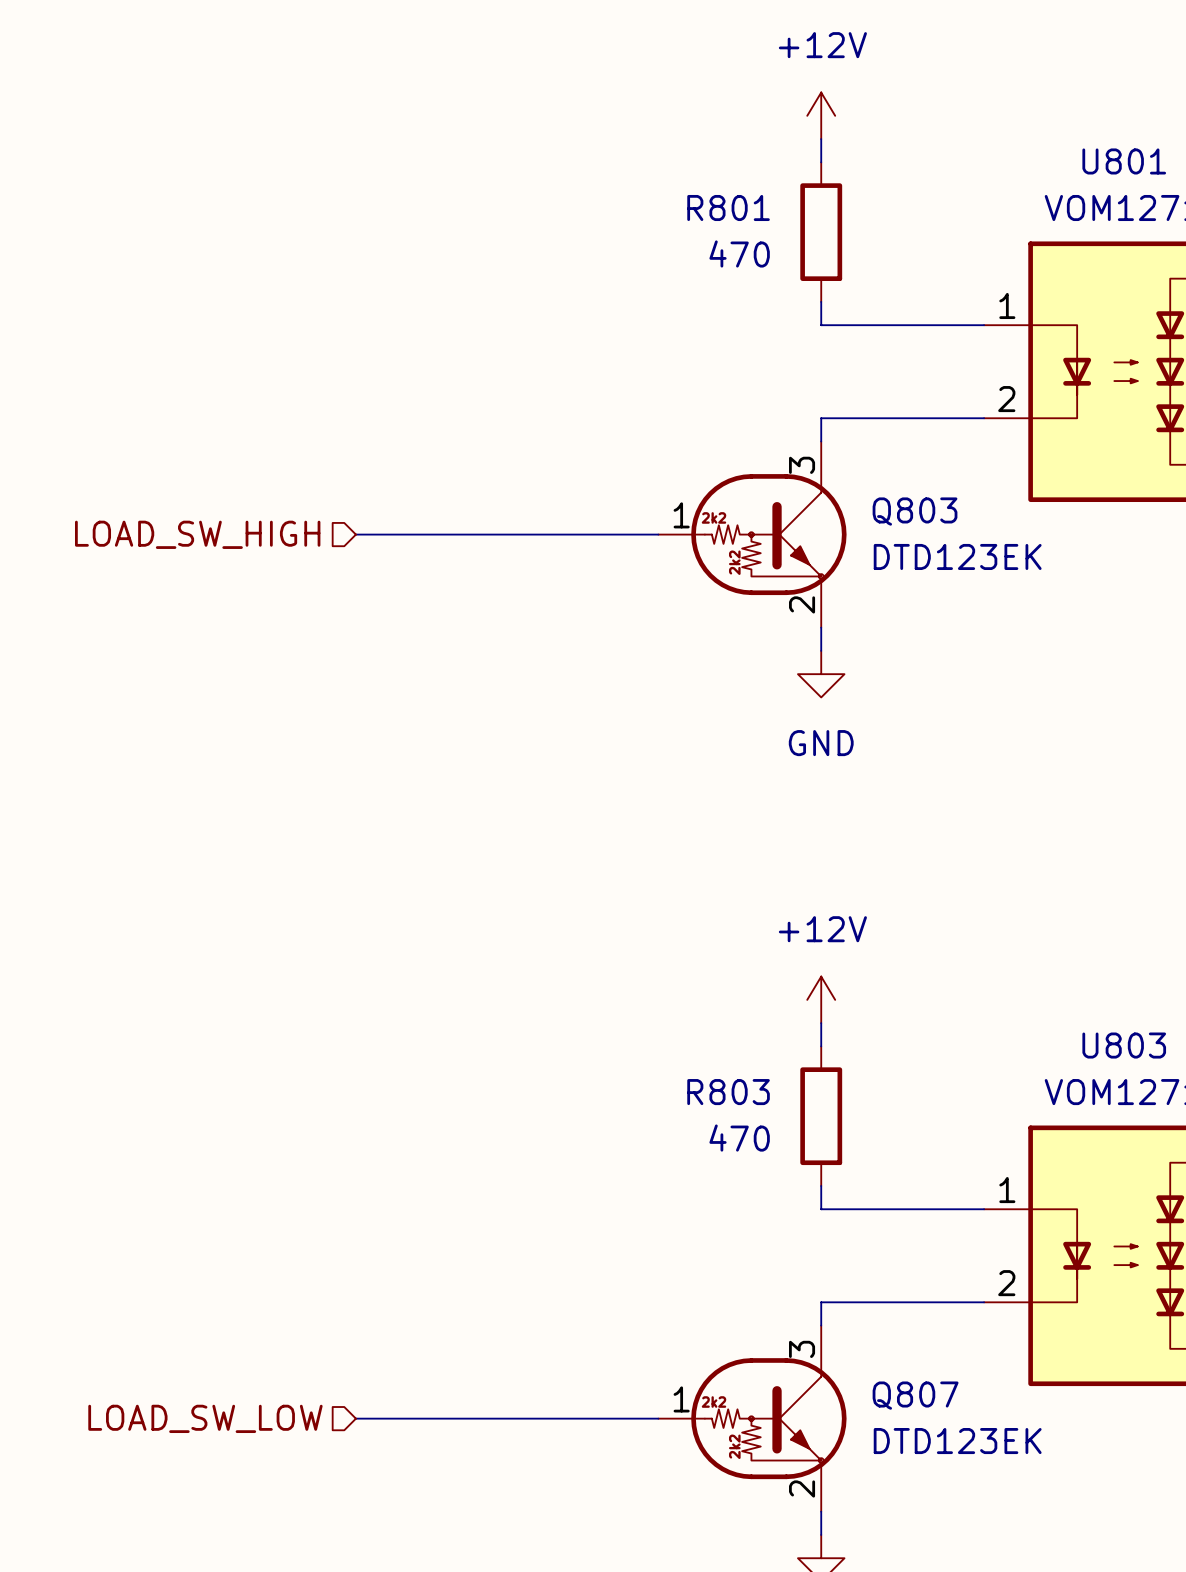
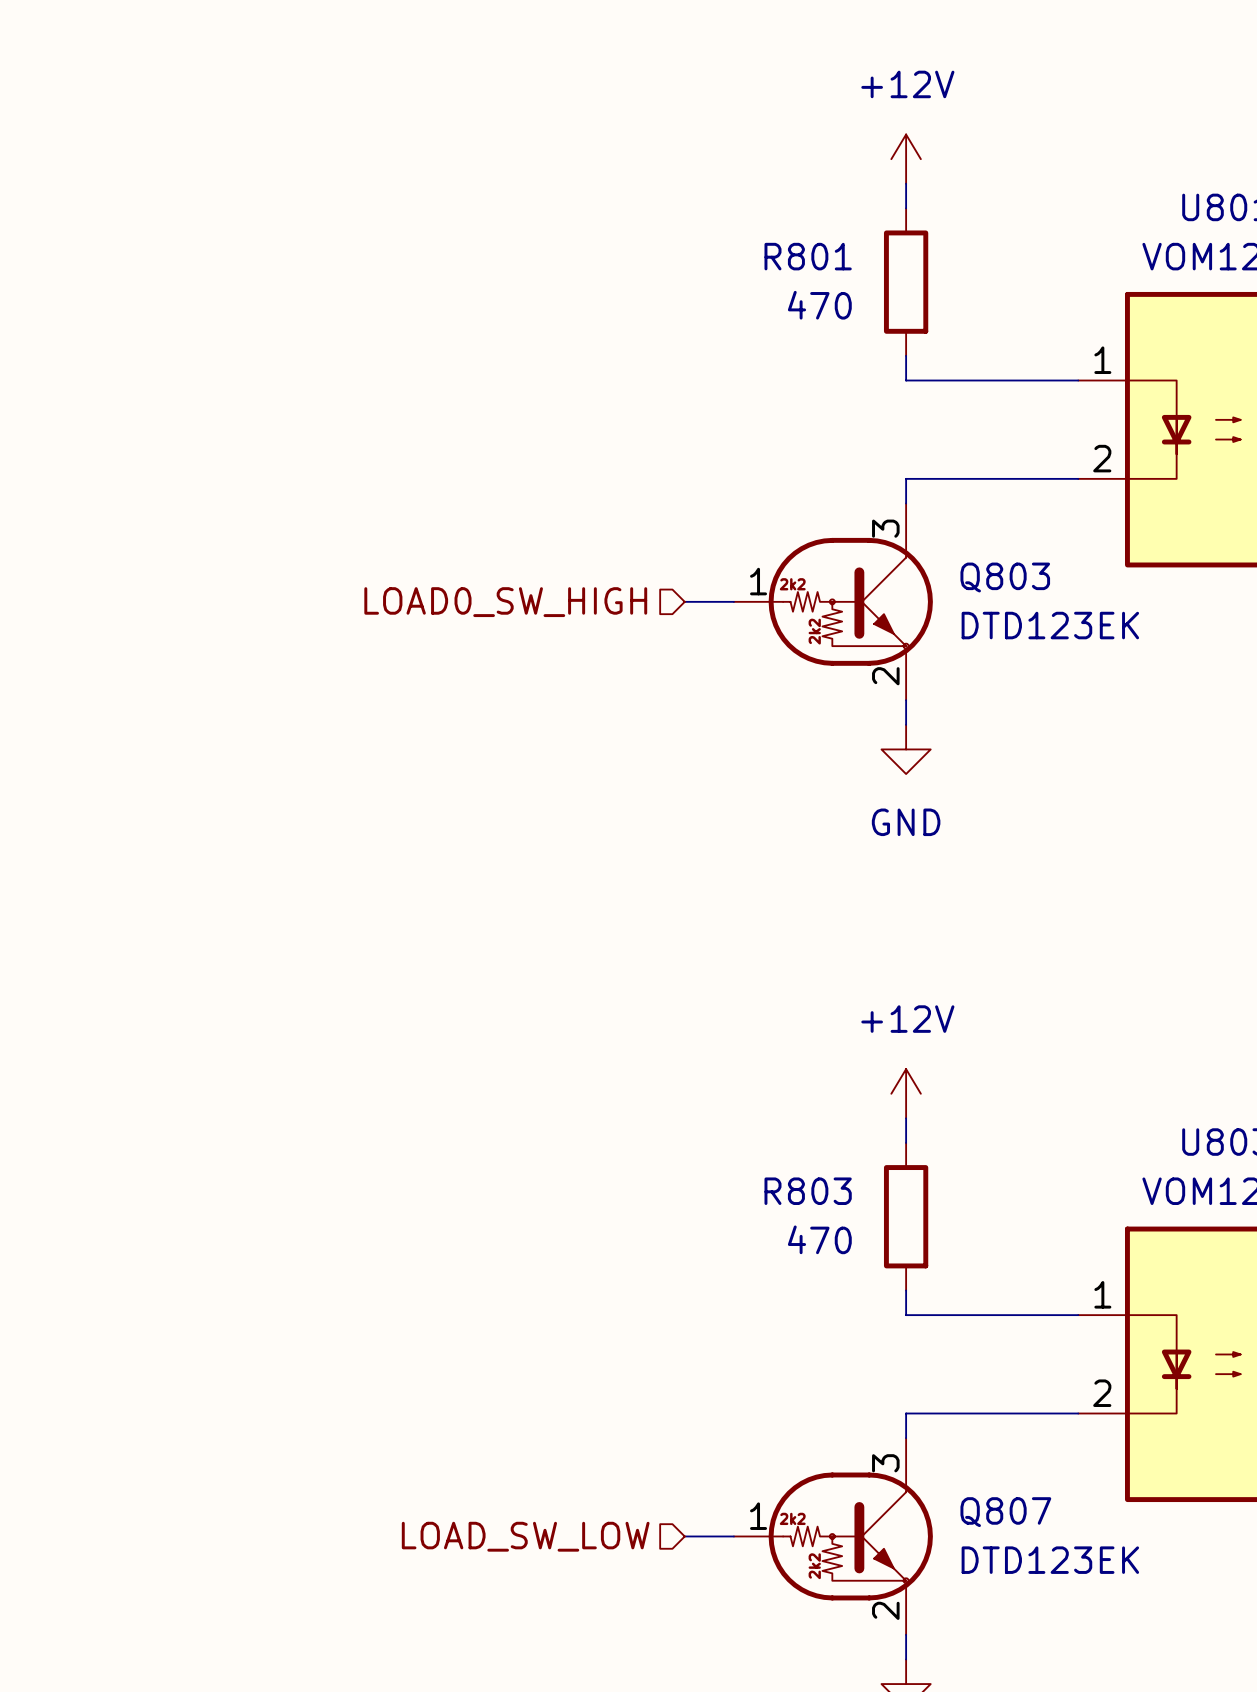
hierarchical label: LOAD_SW_HIGH (197, 534) -> LOAD0_SW_HIGH (505, 602)
wire: (355, 534) (611, 534) -> none
hierarchical label position: LOAD_SW_LOW (205, 1418) -> LOAD_SW_LOW (525, 1536)
wire: (355, 1418) (611, 1418) -> none

